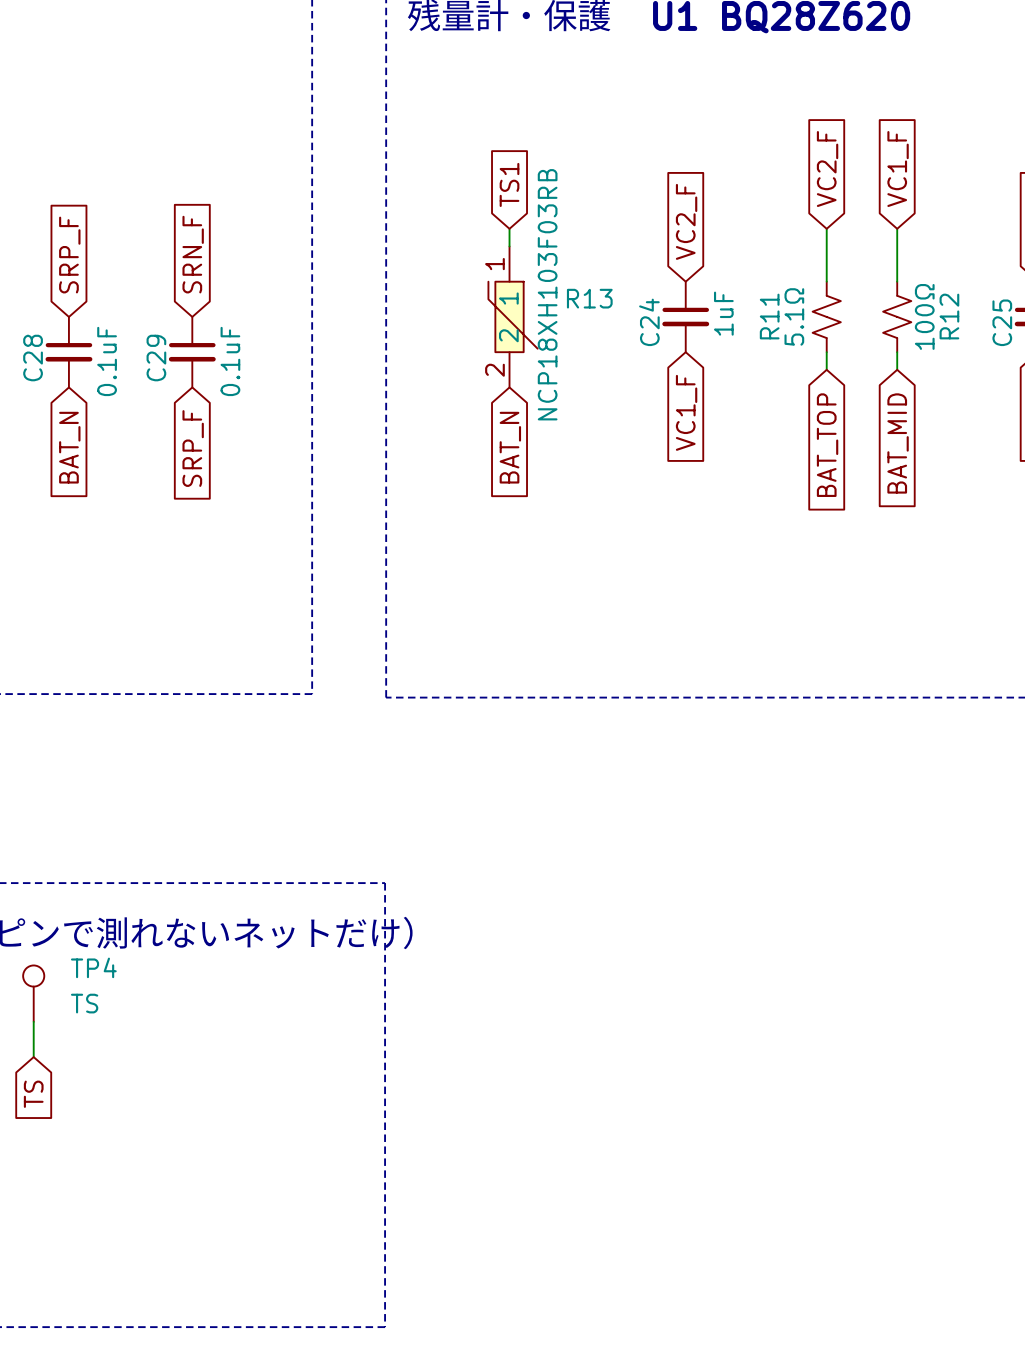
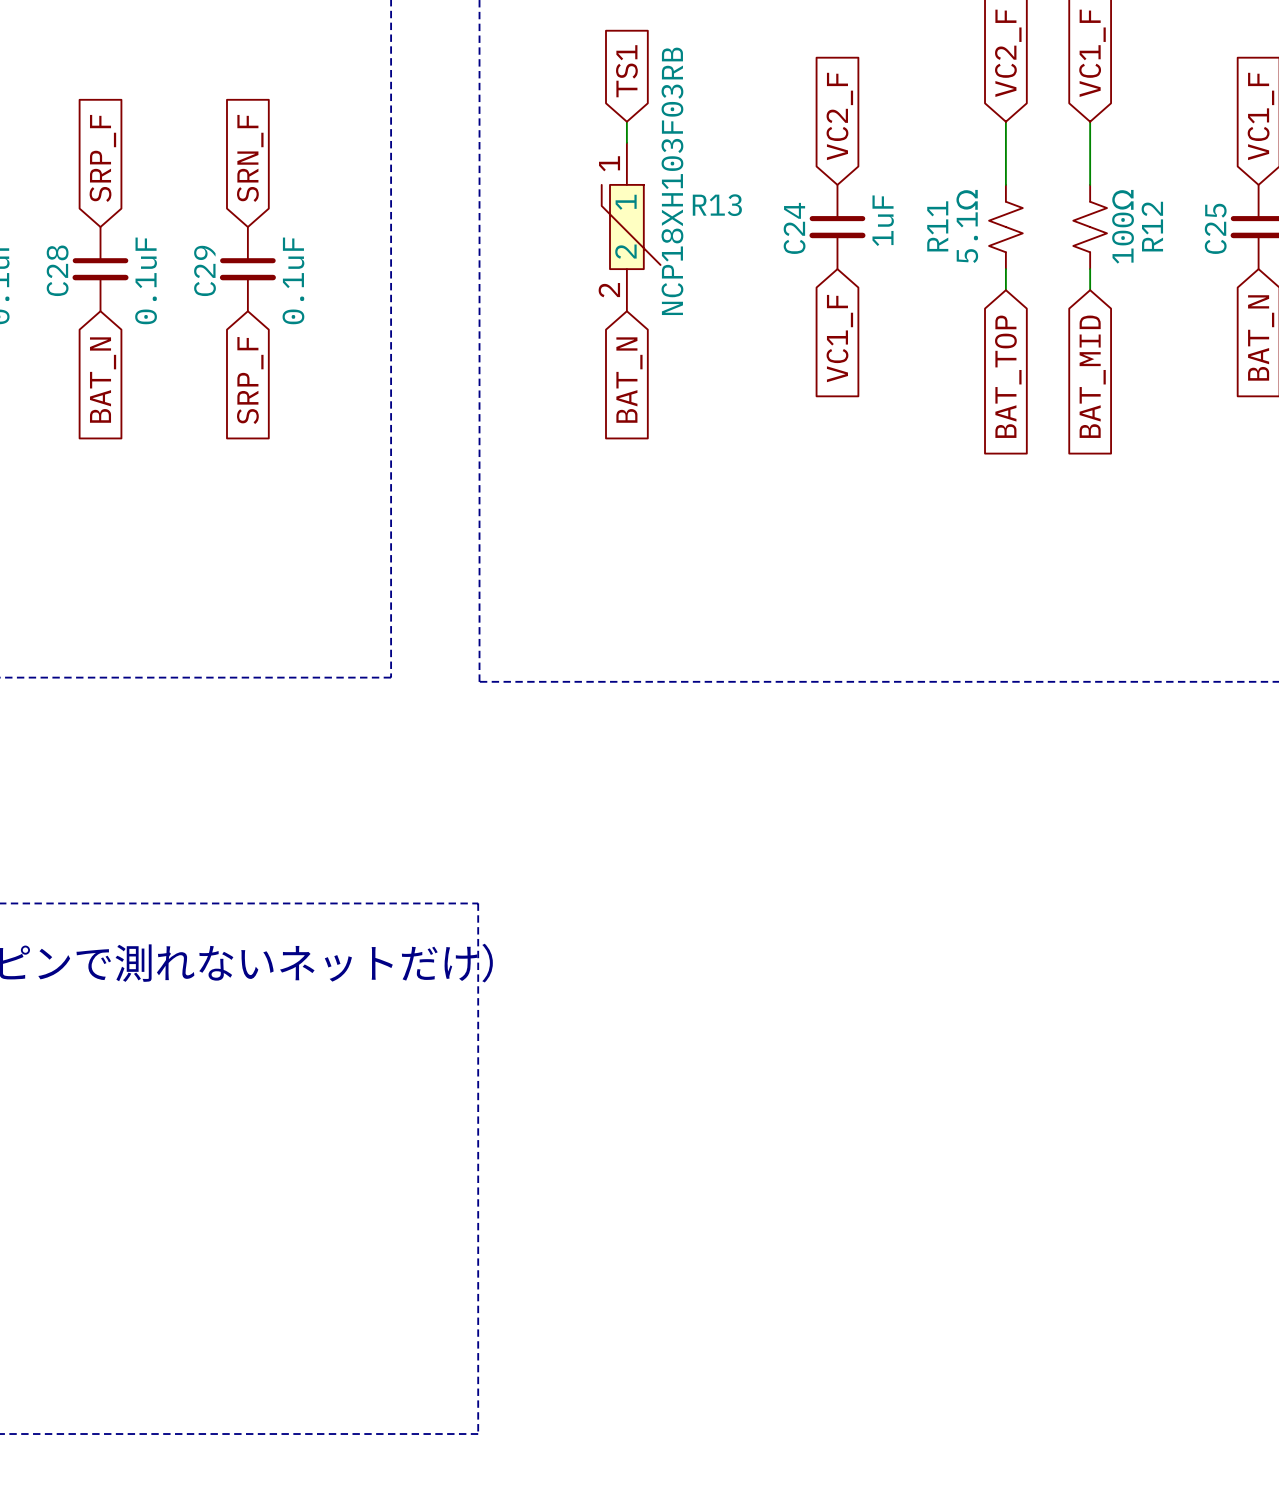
TP4: TS (33, 993) -> none
wire: (33, 1021) (33, 1057) -> none
global label: TS (33, 1094) -> none

